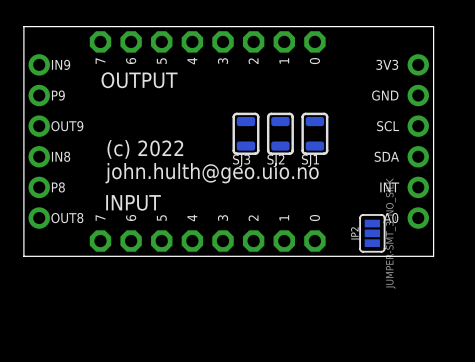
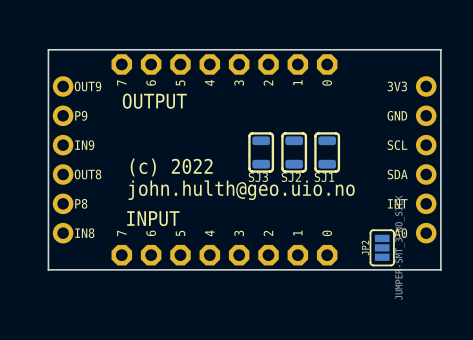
text: IN9 (61, 64) -> OUT9 (88, 86)
text: OUT9 (67, 126) -> IN9 (84, 145)
text: IN8 (61, 156) -> OUT8 (88, 174)
text: OUT8 (67, 218) -> IN8 (84, 233)

